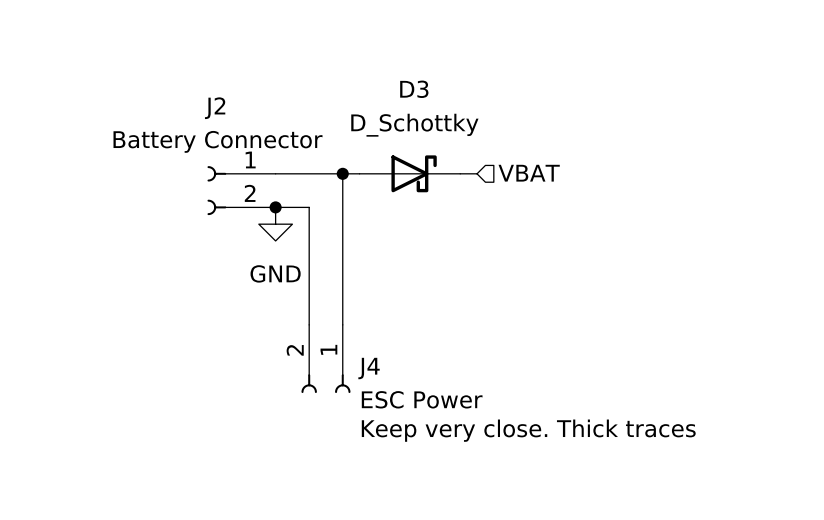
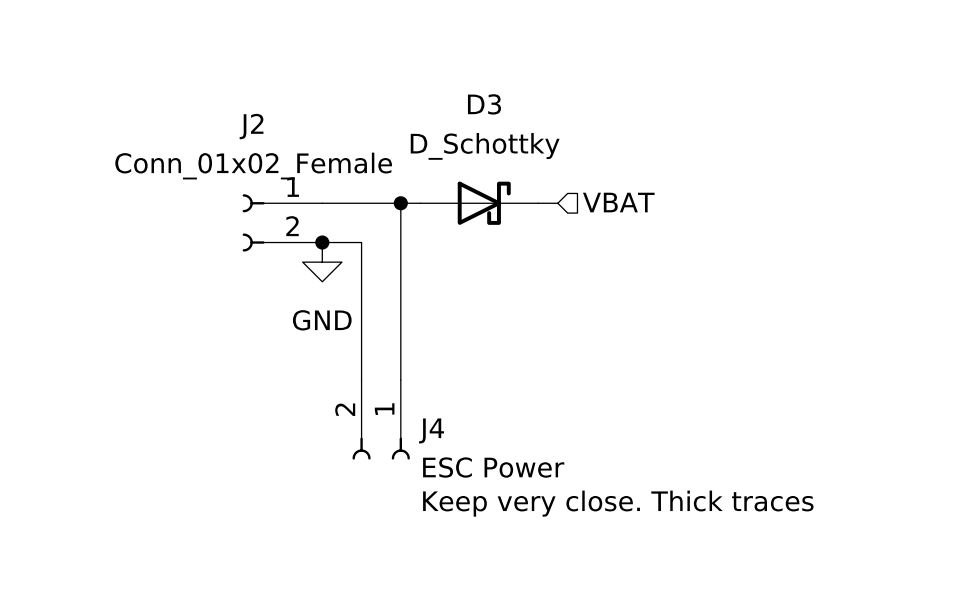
J2 value: Battery Connector (218, 141) -> Conn_01x02_Female (253, 166)

